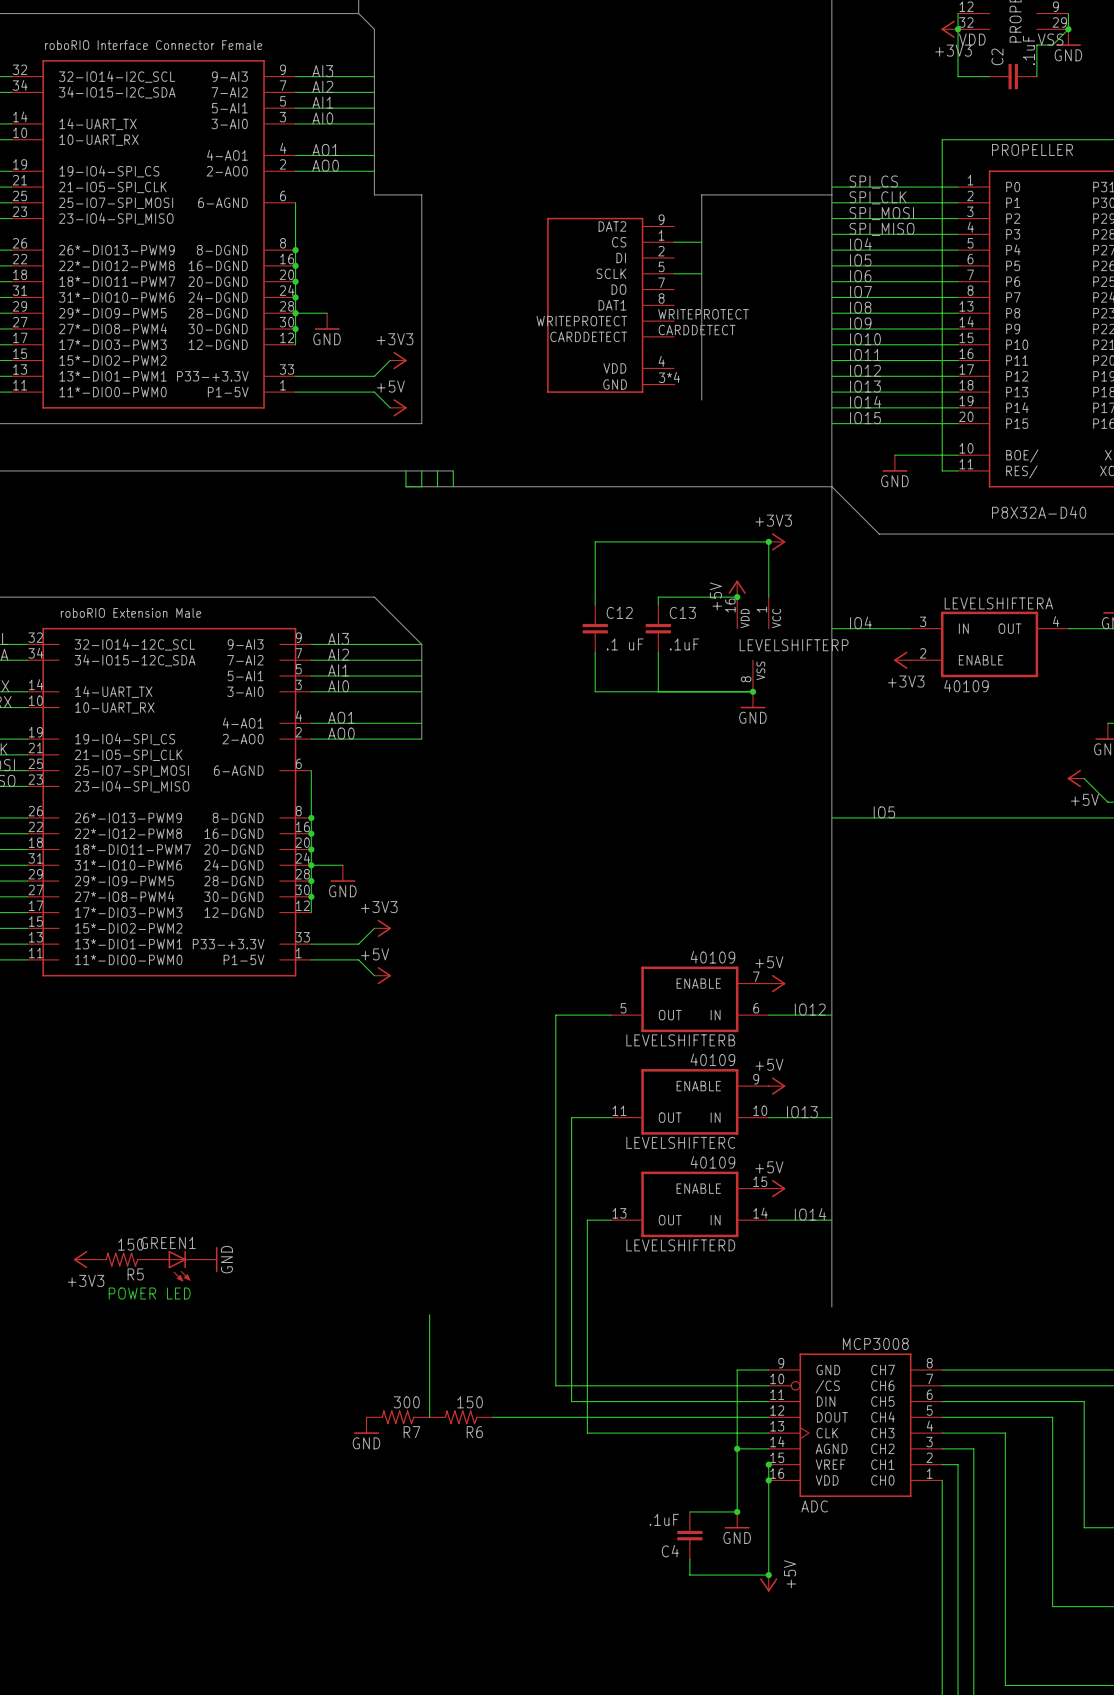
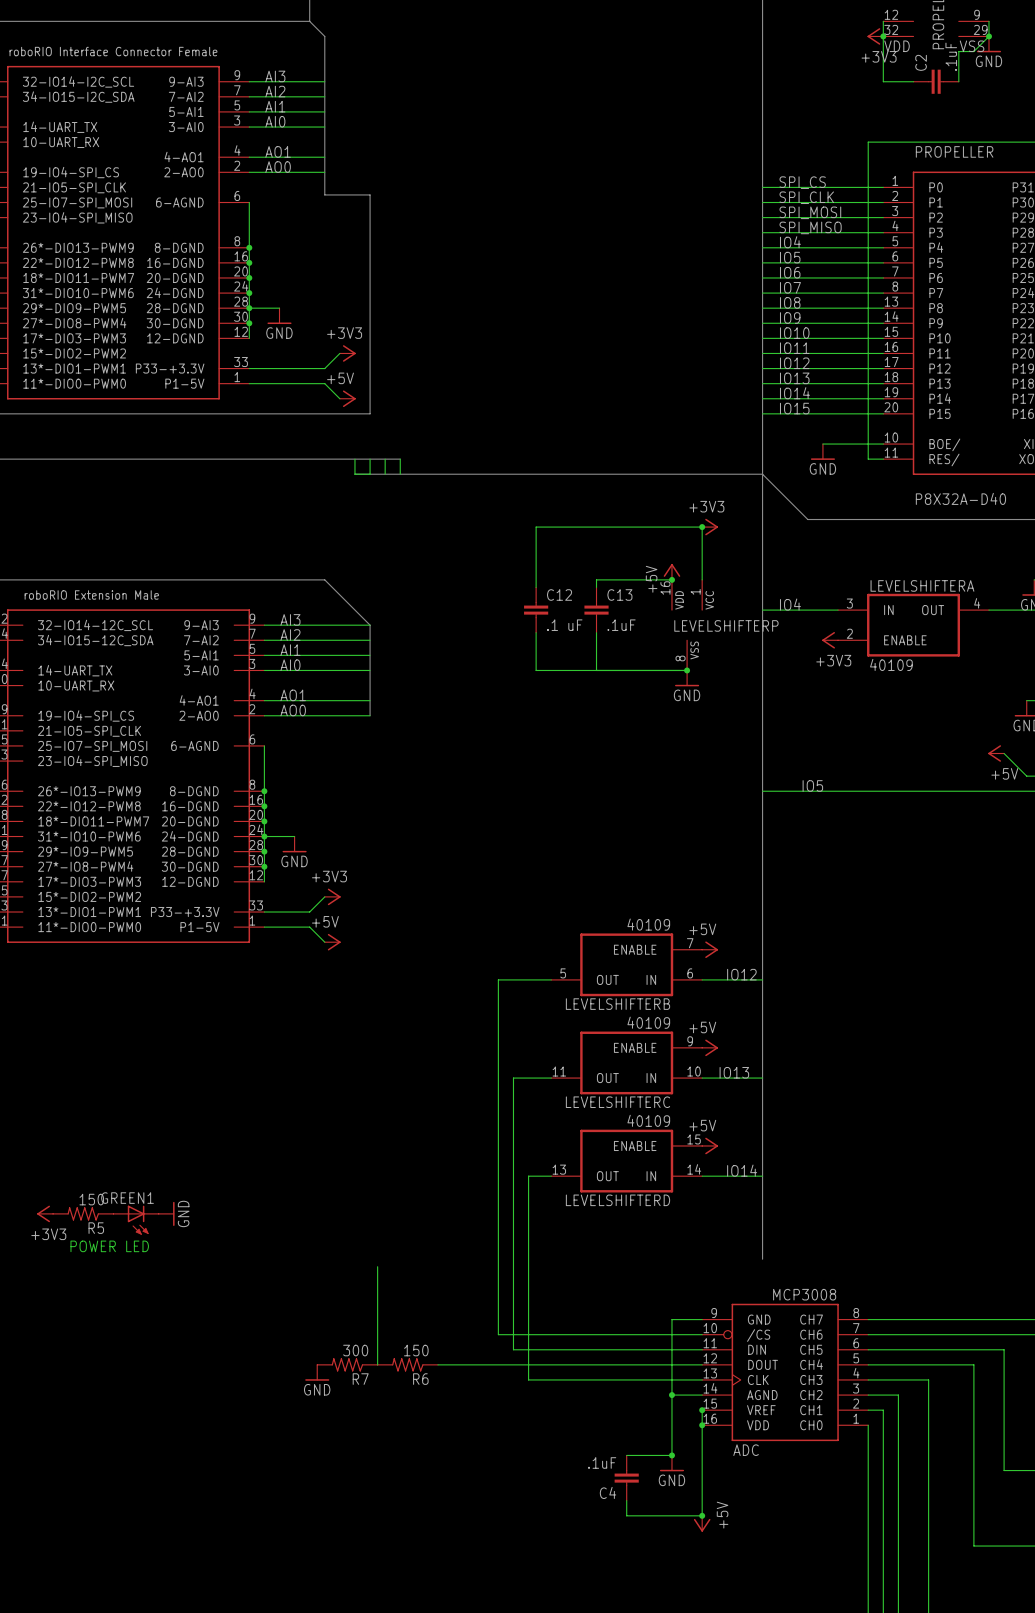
bus: (831, 194) (701, 194) (701, 399) -> none
wire: (674, 242) (701, 242) -> none
wire: (674, 273) (701, 273) -> none
part: (610, 305) -> none

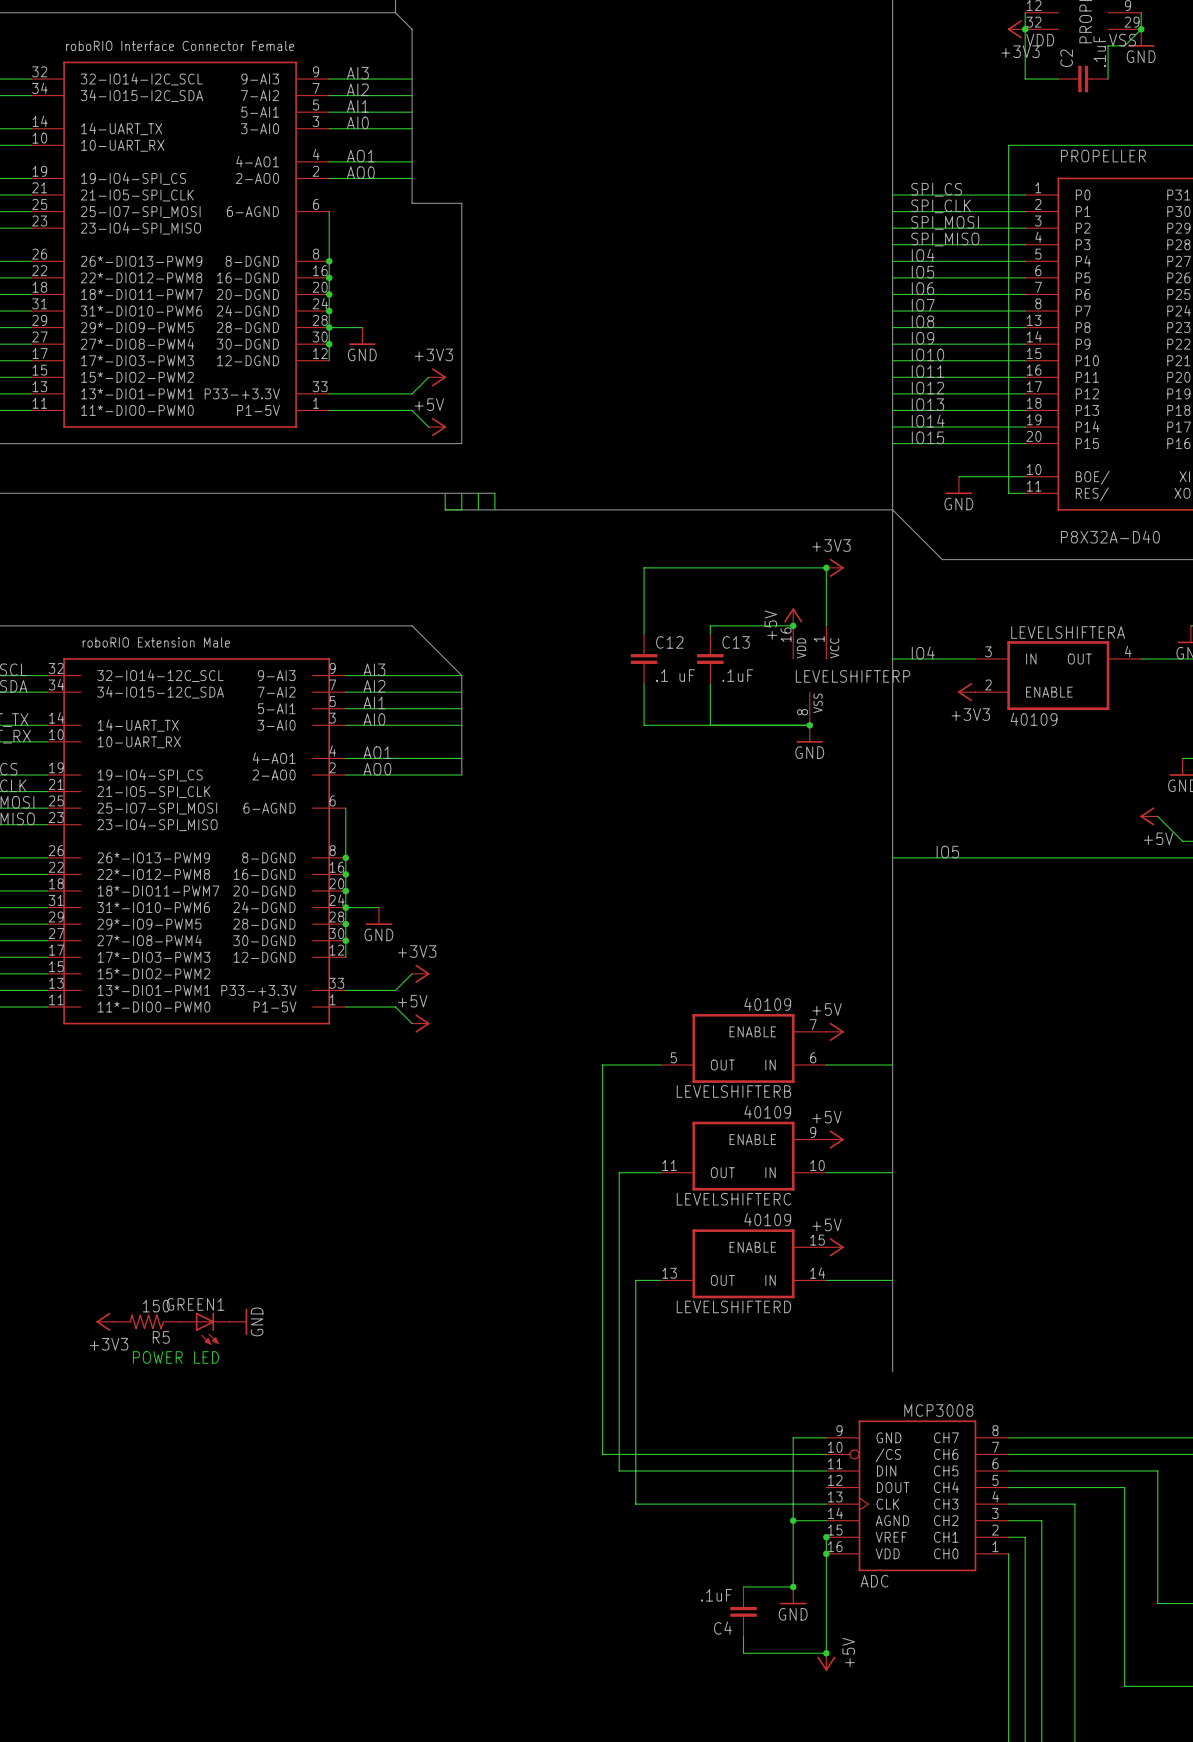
label: IO12 (741, 974) -> none
label: IO13 (734, 1072) -> none
label: IO14 (742, 1170) -> none
wire: (377, 1266) (377, 1364) -> none
R7: 300 (347, 1364) -> none
R6: 150 (407, 1364) -> none
wire: (438, 1364) (702, 1364) -> none
power symbol: GND (317, 1372) -> none

